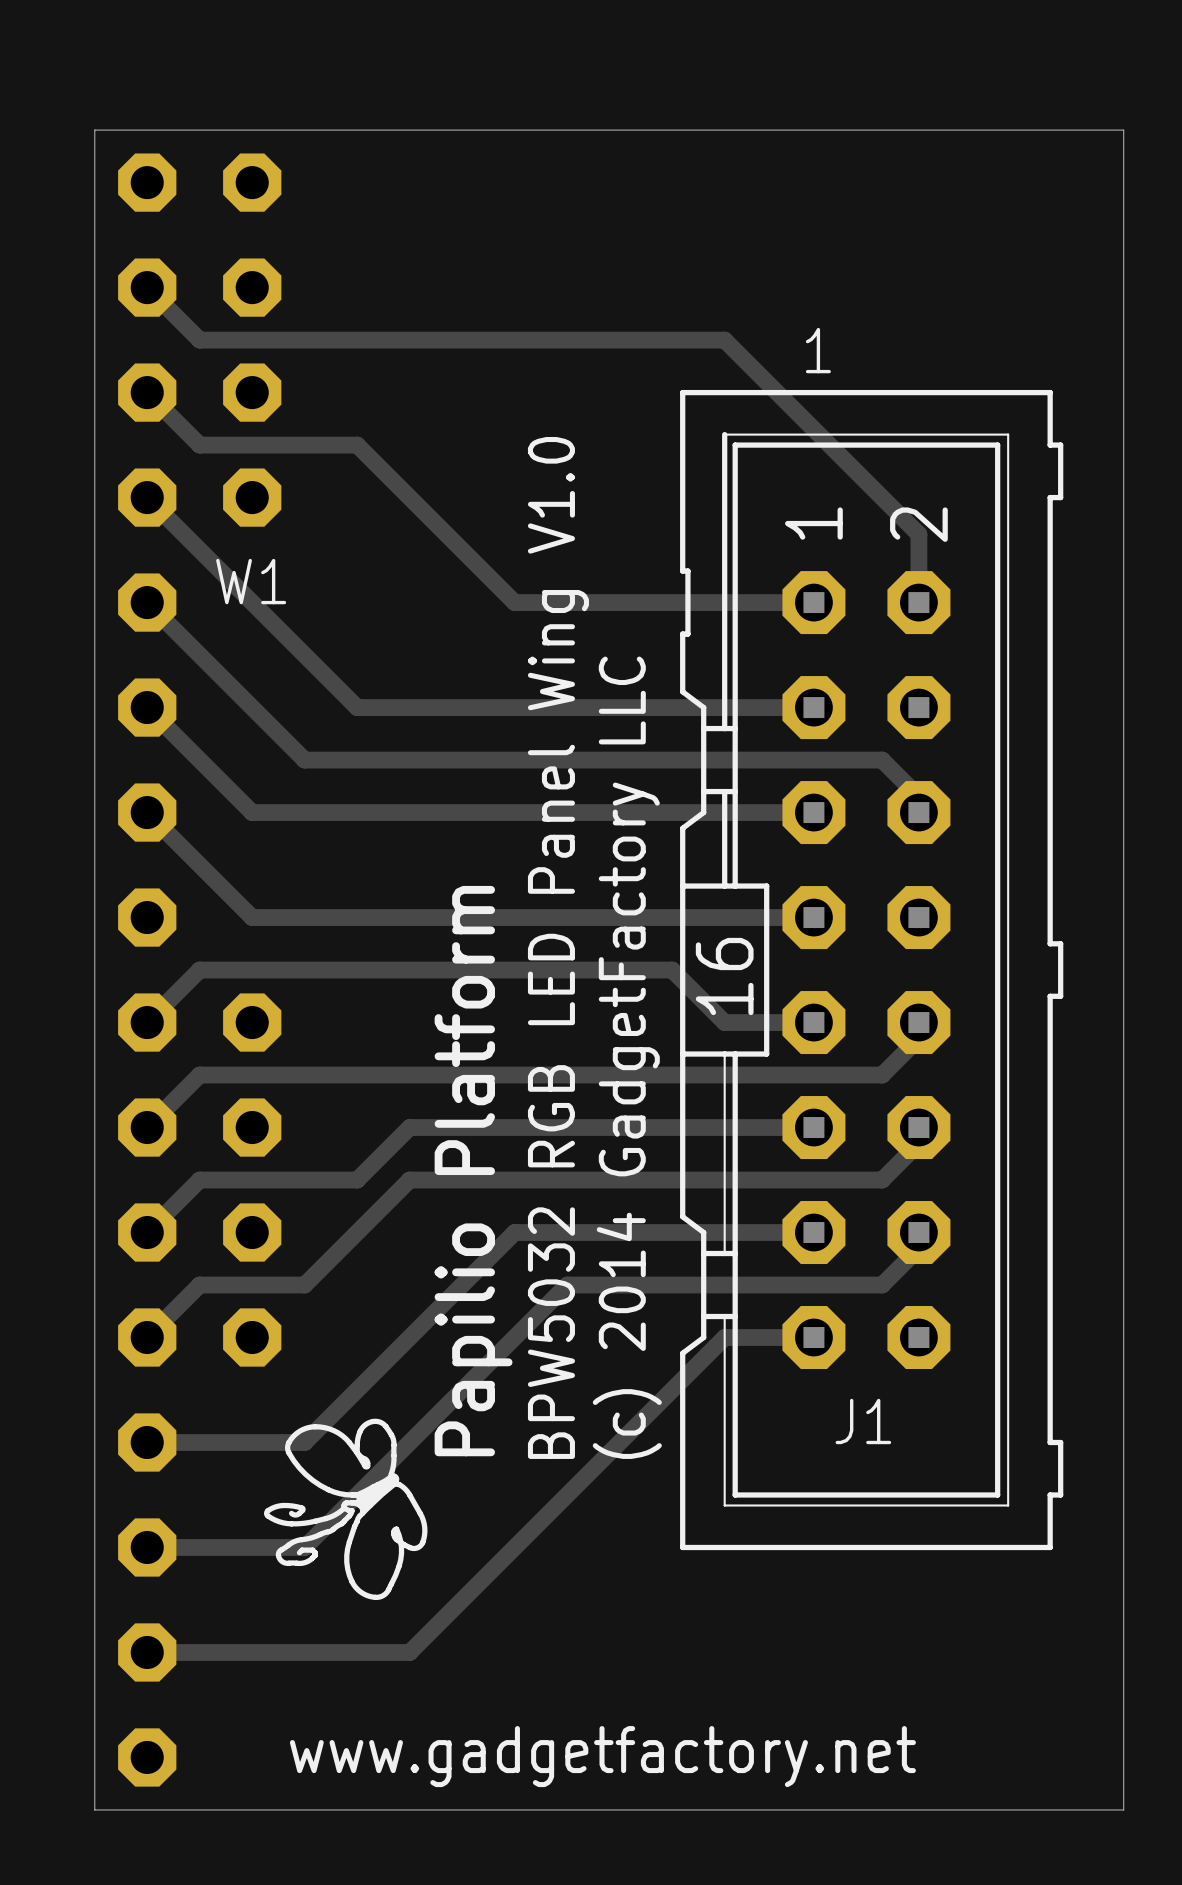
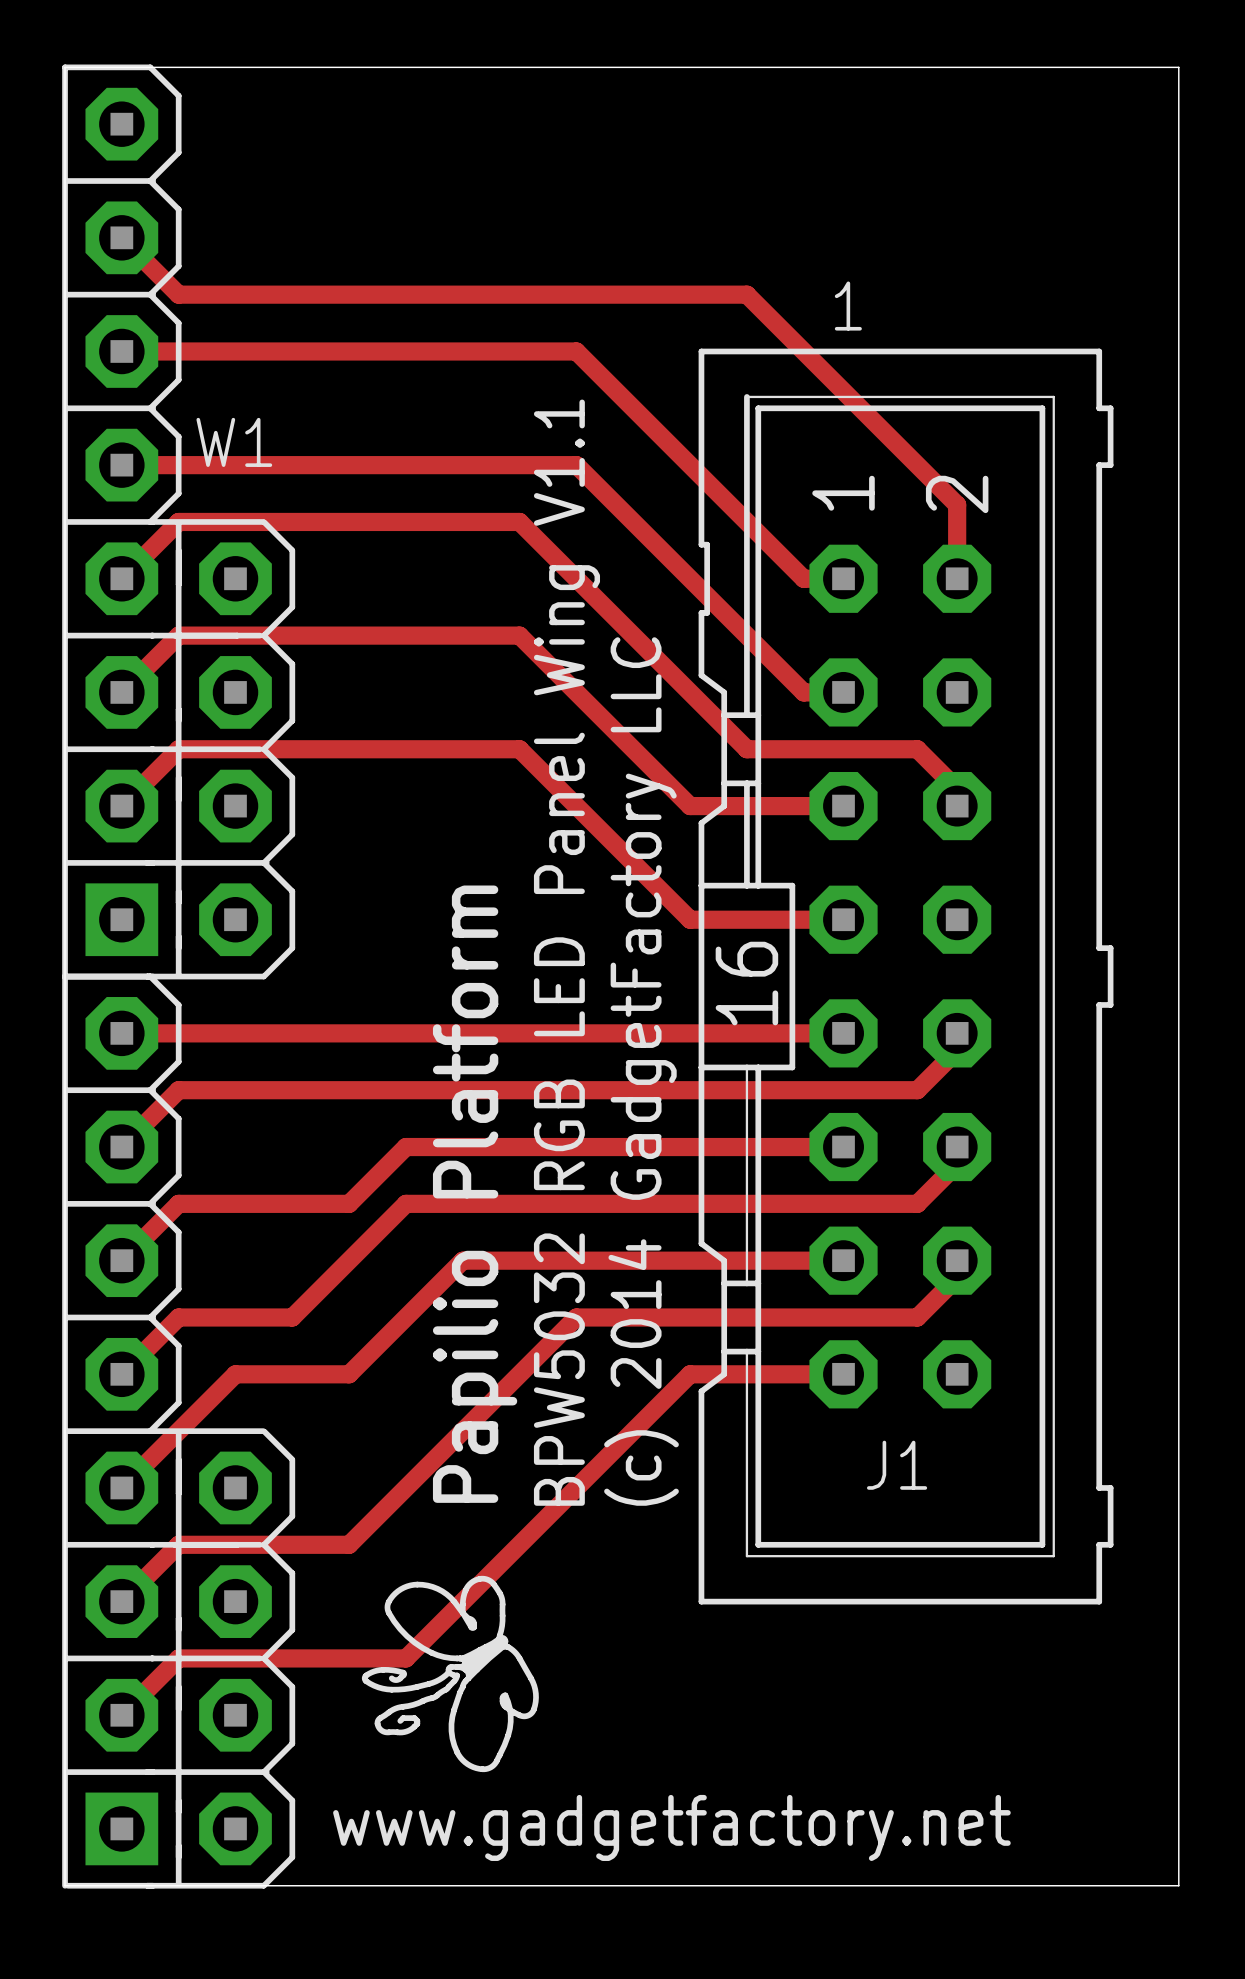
track: (147, 392) (199, 445) (357, 445) (514, 602) (777, 602) -> (121, 351) (576, 351) (803, 578)
track: (147, 497) (357, 707) (777, 707) -> (121, 465) (576, 465) (803, 692)
part: none -> (178, 521)
text position: W1 (251, 581) -> W1 (234, 442)
track: (147, 602) (304, 760) -> (121, 806) (178, 749) (292, 749)
track: none -> (121, 578) (178, 521) (519, 521) (746, 749)
track: (147, 707) (252, 812) (672, 812) -> (121, 692) (178, 635) (519, 635) (690, 806)
track: (514, 760) (724, 760) -> (519, 749) (690, 919)
track: (147, 812) (252, 917) (672, 917) -> none
text: BPW5032 RGB LED Panel Wing V1.0 (558, 947) -> BPW5032 RGB LED Panel Wing V1.1 (566, 952)
part: (199, 970) -> none
track: (147, 1022) (199, 970) (672, 970) (724, 1022) -> (121, 1033) (746, 1033)
track: (514, 1232) (304, 1442) (147, 1442) -> (519, 1260) (462, 1260) (349, 1374) (235, 1374) (121, 1487)
track: (724, 1337) (409, 1652) (147, 1652) -> (746, 1374) (690, 1374) (405, 1658) (178, 1658) (121, 1715)
part: none -> (178, 1431)
track: (357, 1494) (304, 1547) (147, 1547) -> (349, 1544) (178, 1544) (121, 1601)
drawing position: (345, 1509) -> (450, 1673)
text position: www.gadgetfactory.net (602, 1756) -> www.gadgetfactory.net (671, 1827)

